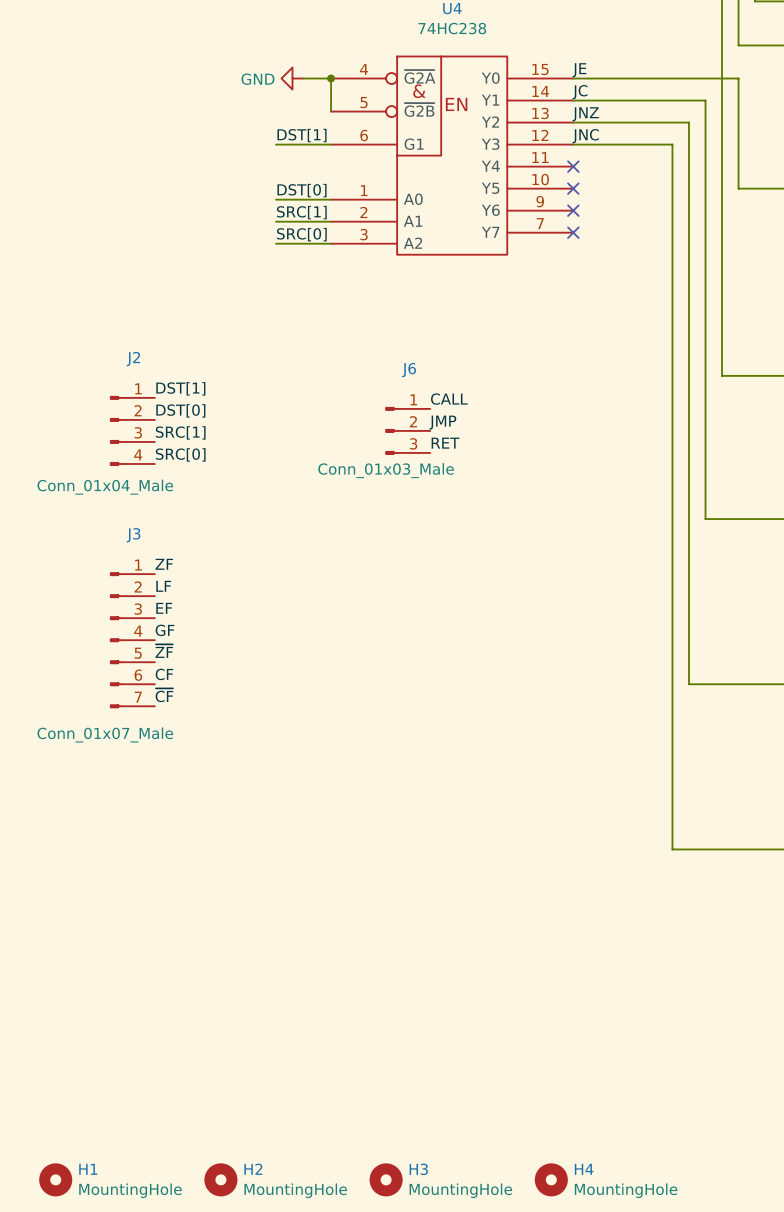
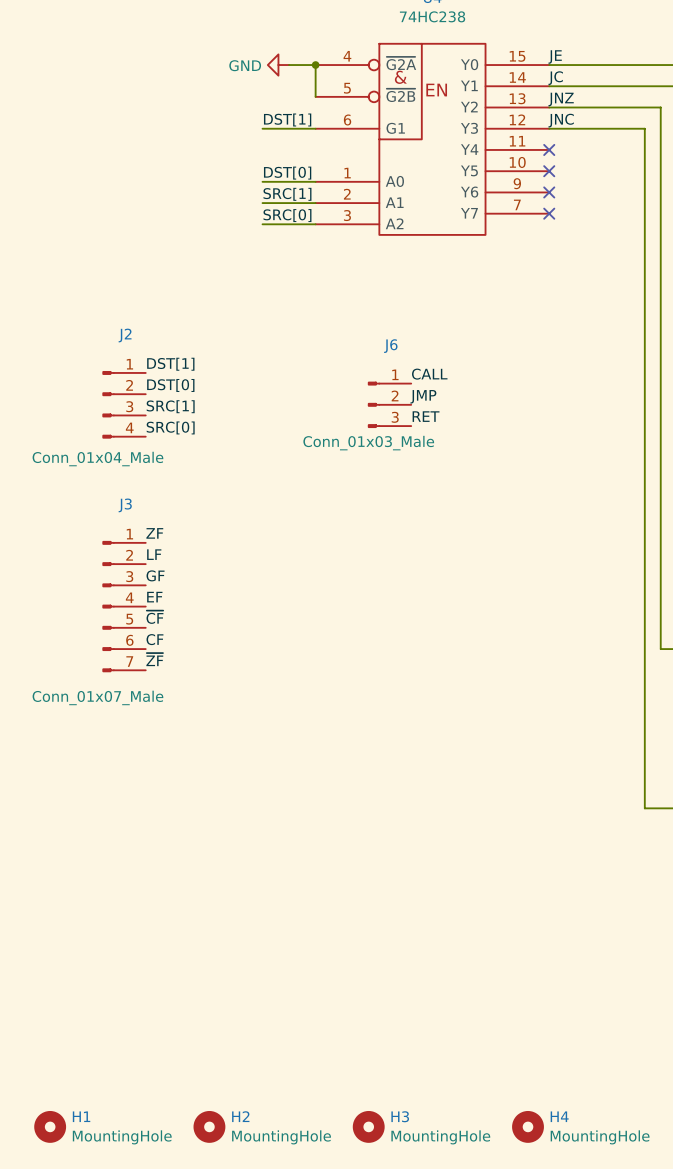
label: EF (164, 608) -> GF (155, 575)
label: GF (165, 630) -> EF (154, 597)
label: ~{ZF} (164, 651) -> ~{CF} (154, 617)
label: ~{CF} (164, 695) -> ~{ZF} (154, 659)

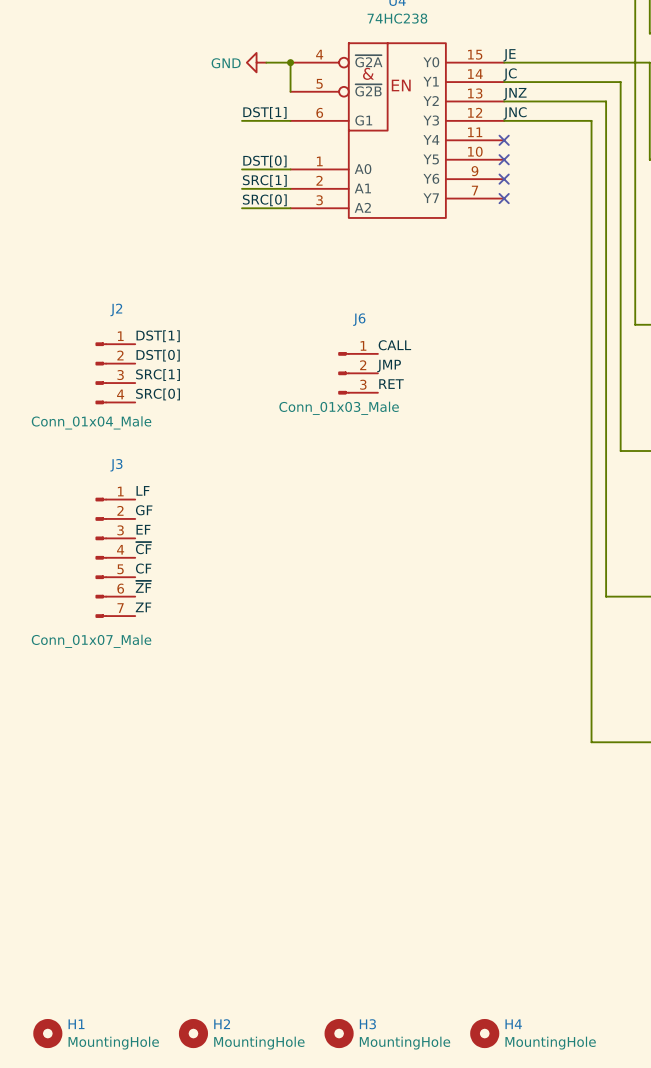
label: ZF (154, 533) -> LF (143, 490)
label: LF (154, 554) -> GF (144, 510)
label: GF (155, 575) -> EF (143, 529)
label: EF (154, 597) -> ~{CF} (143, 548)
label: ~{CF} (154, 617) -> CF (143, 568)
label: CF (154, 639) -> ~{ZF} (143, 586)
label: ~{ZF} (154, 659) -> ZF (143, 607)

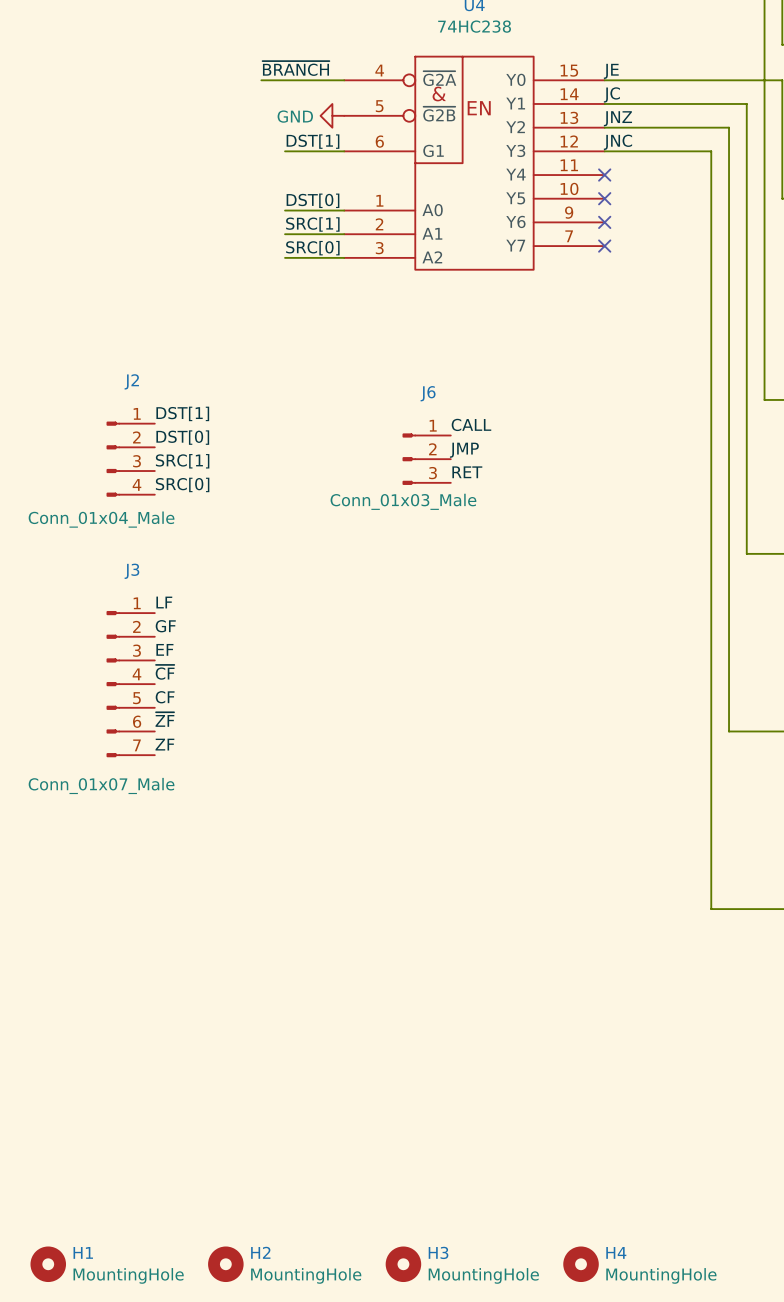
label: none -> ~{BRANCH} (295, 68)
wire: none -> (261, 80) (314, 80)
power symbol position: GND (256, 62) -> GND (332, 115)
wire: (290, 62) (290, 91) -> none
junction: (290, 62) -> none

